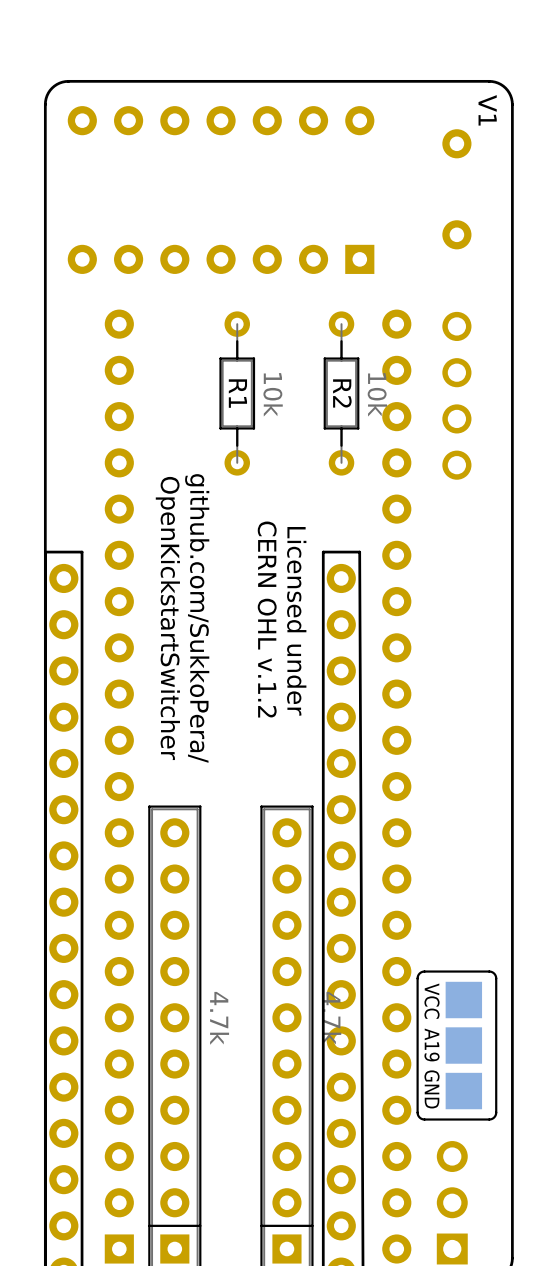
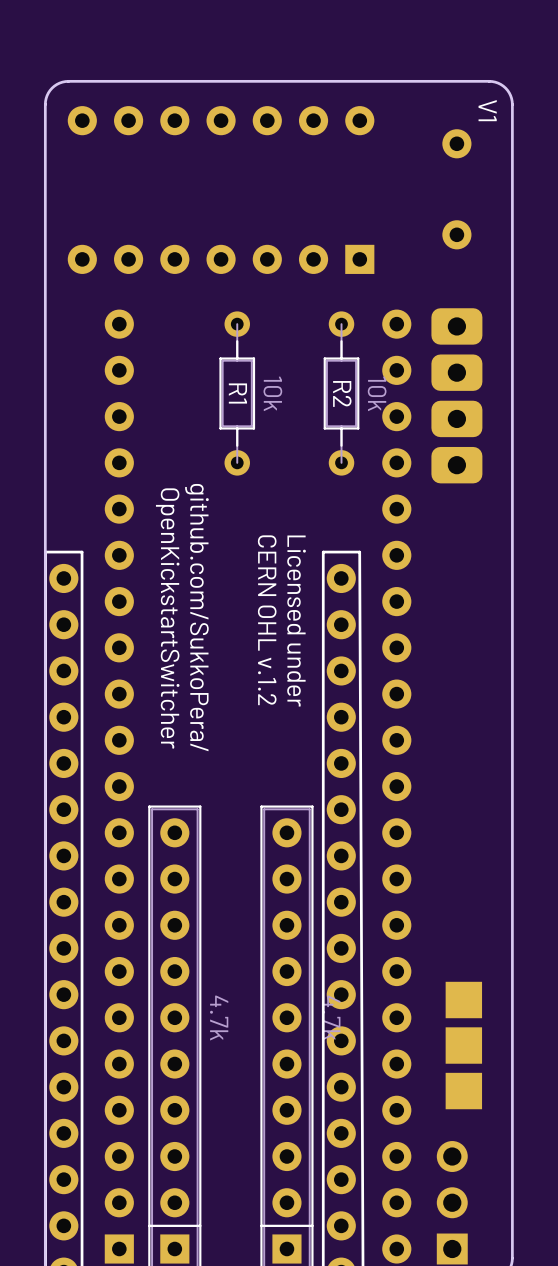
part footprint: [442, 311, 472, 480] -> [431, 308, 483, 484]
line: (489, 971) (424, 971) (418, 975) (417, 1112) (421, 1118) (489, 1119) (495, 1115) (496, 978) (494, 973) (489, 971) -> none
text: VCC (432, 1001) -> none
text: A19 (432, 1044) -> none
text: GND (432, 1089) -> none

